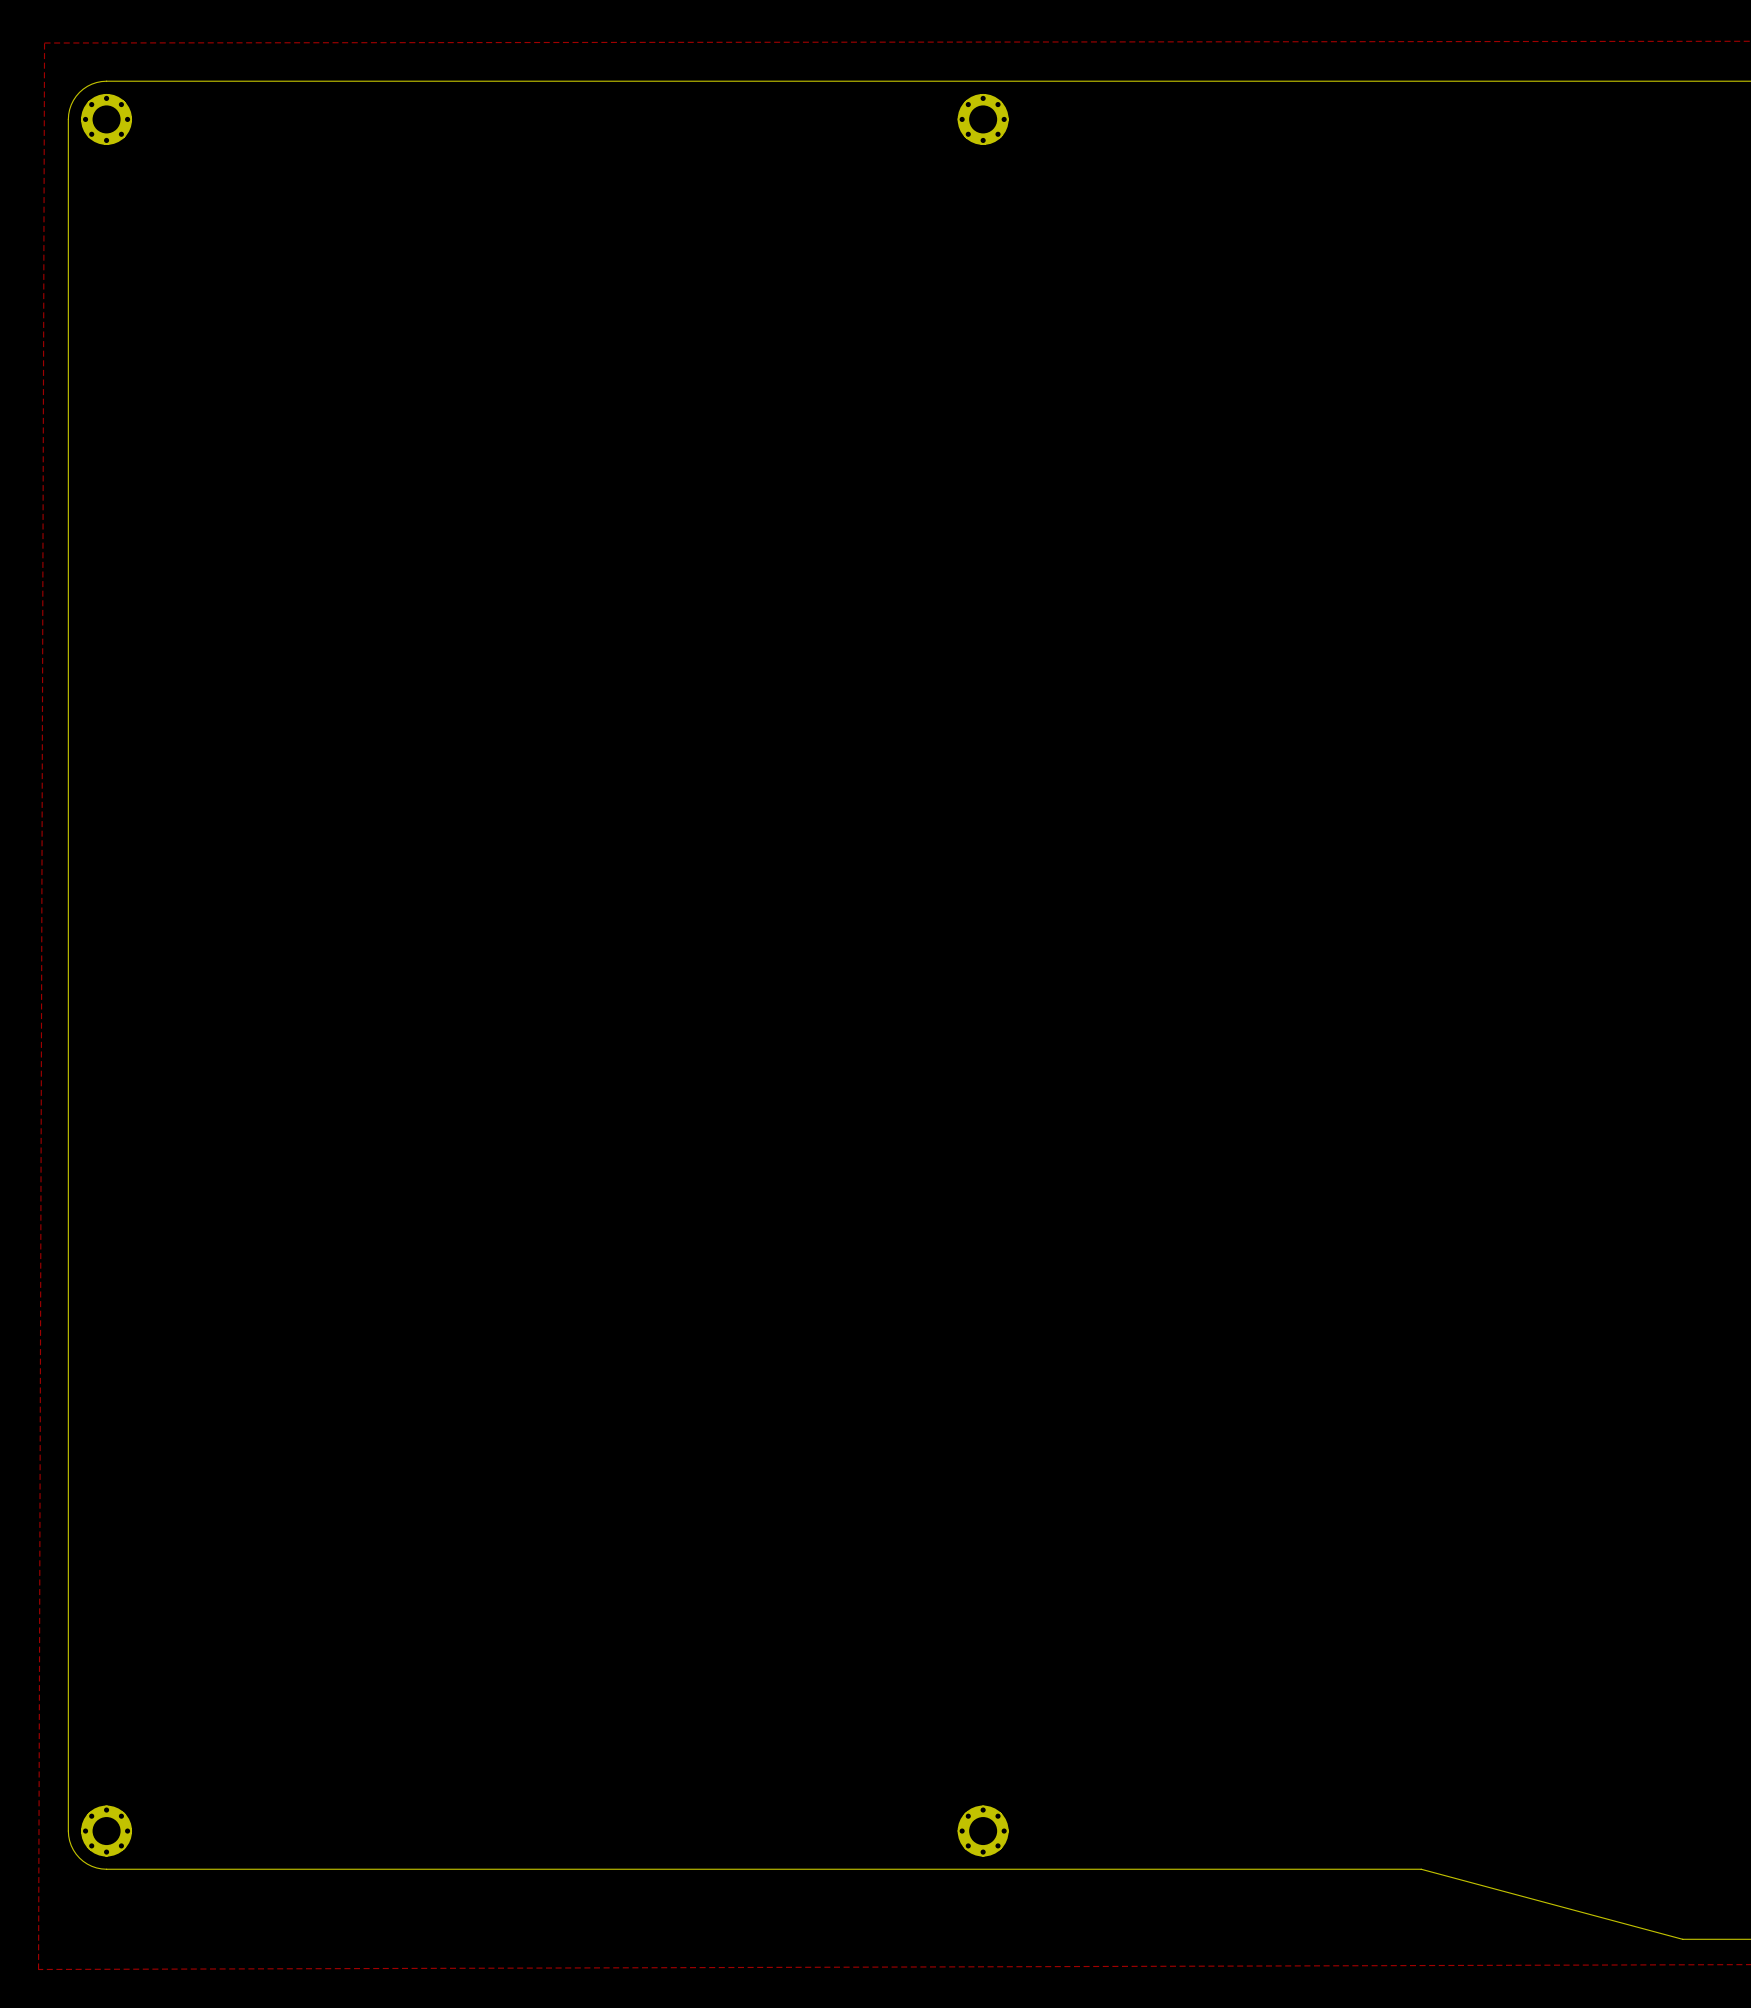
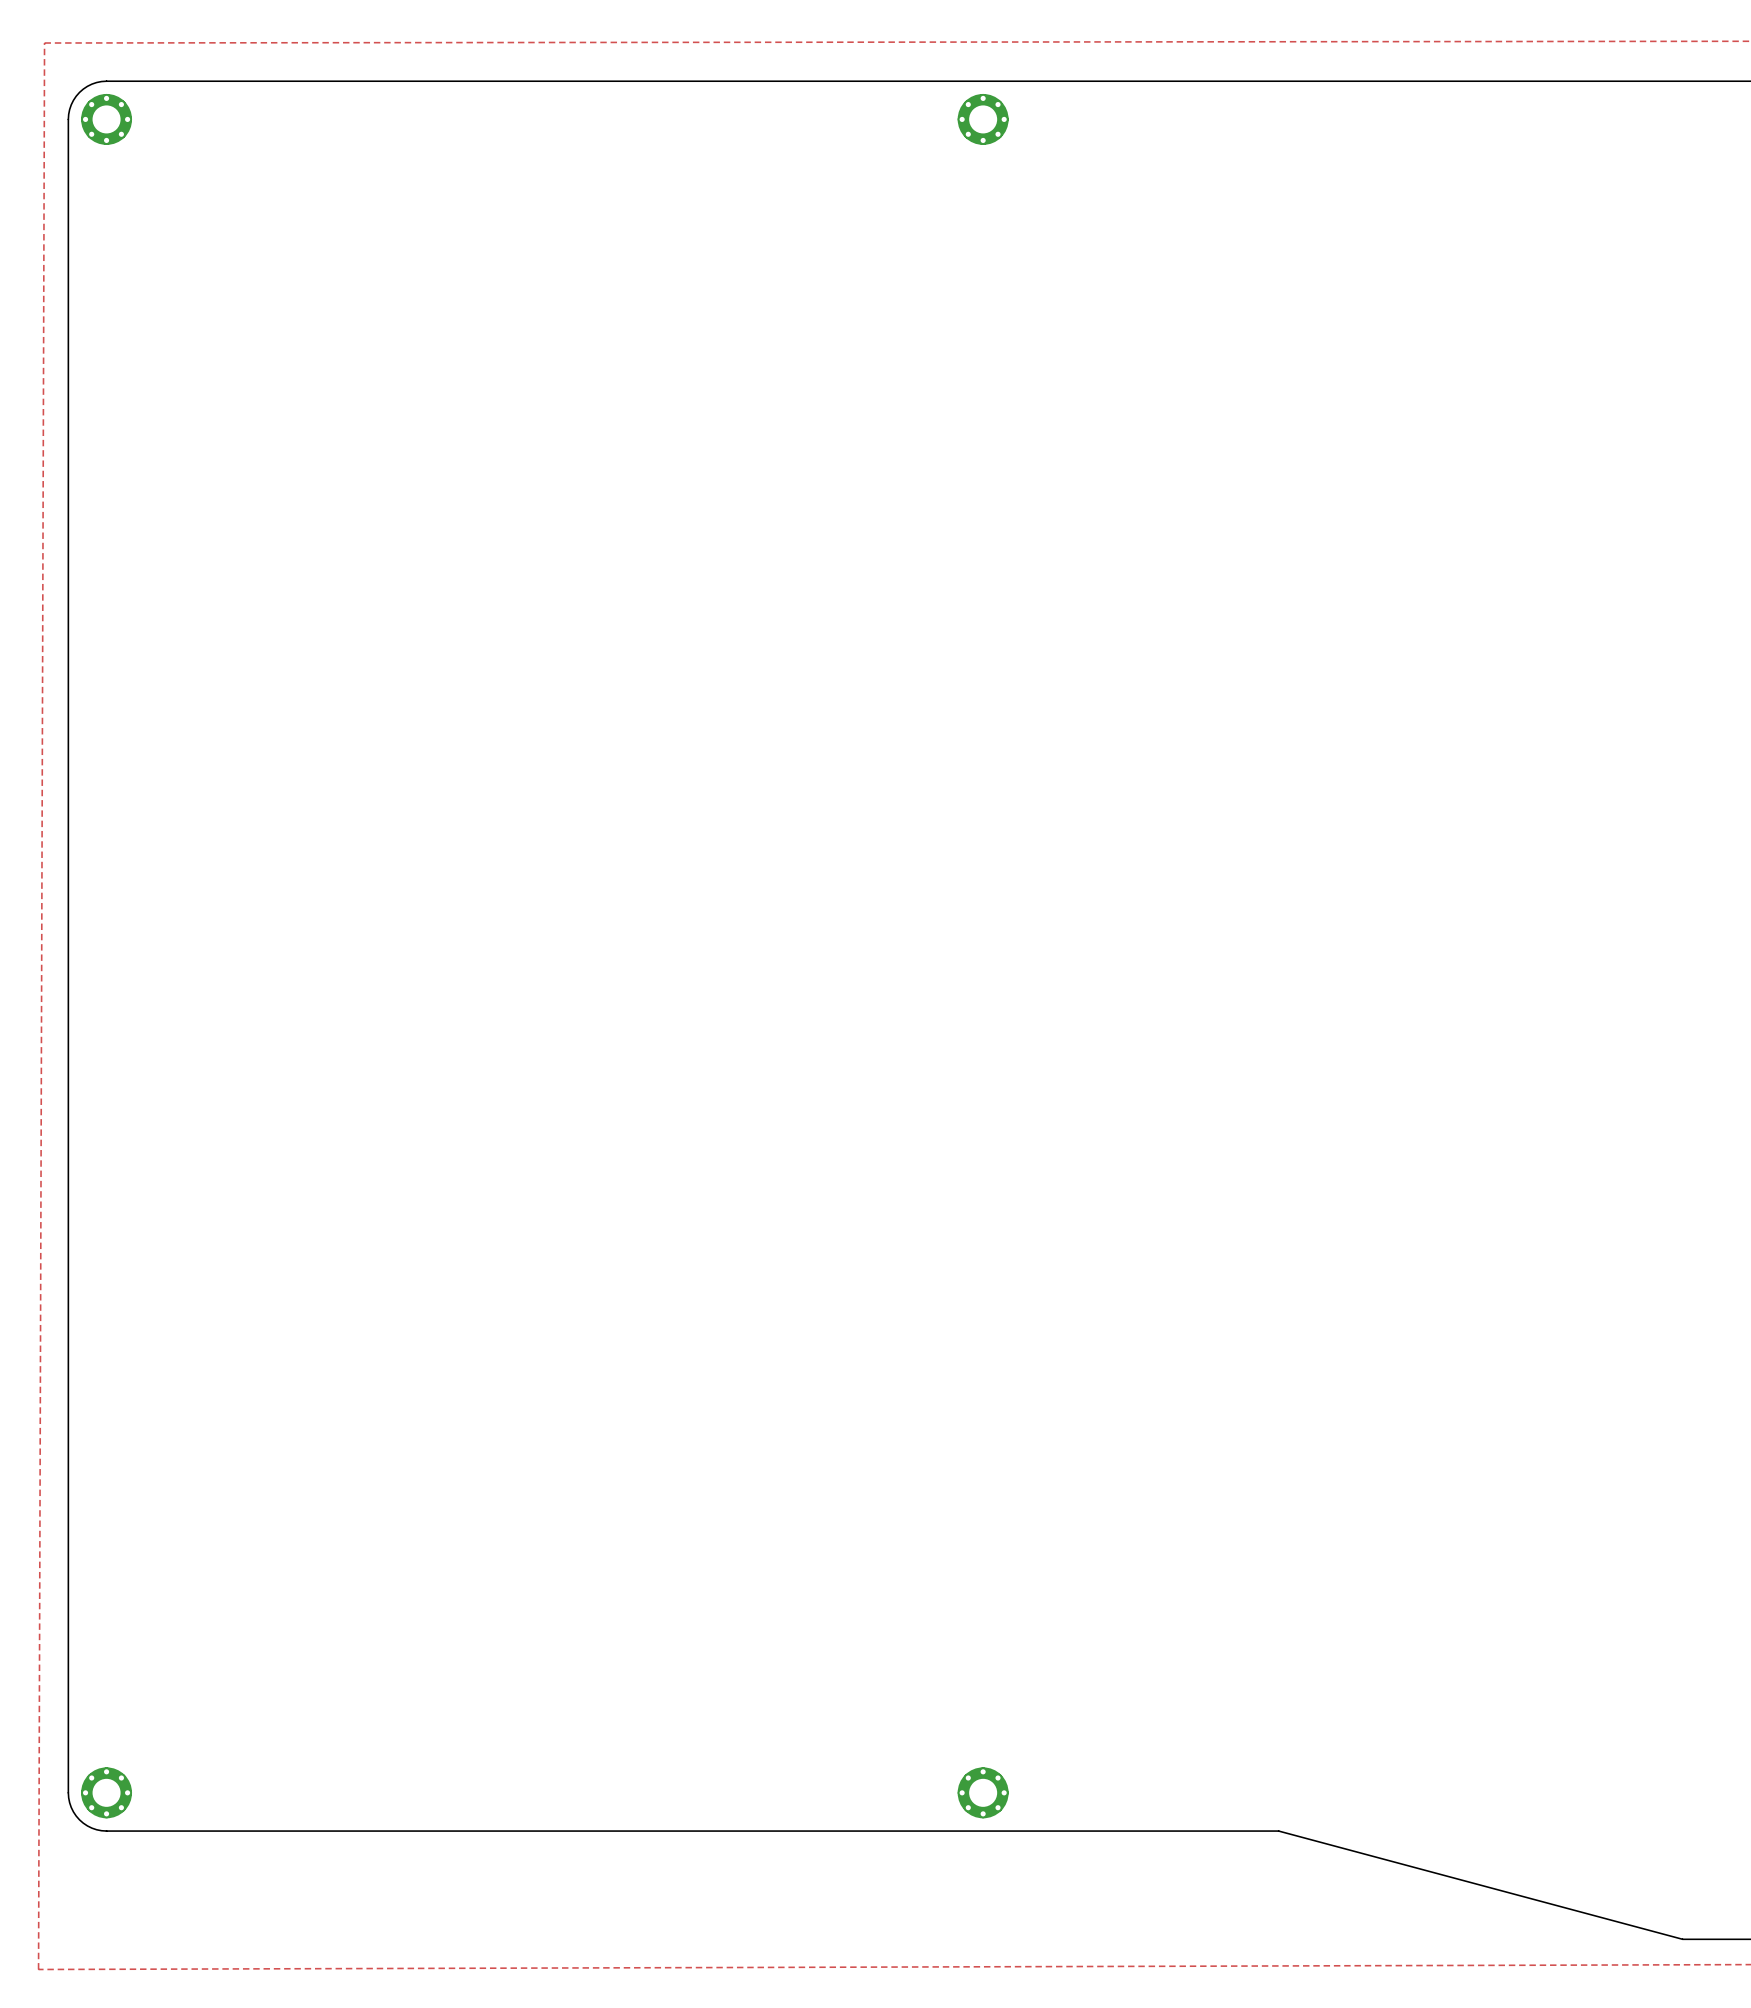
board edge: (68, 1792) (68, 1836) (73, 1850) (87, 1864) (106, 1869) (1421, 1869) -> (68, 1792) (71, 1807) (79, 1819) (91, 1828) (106, 1831) (1278, 1831) (1421, 1869)
part position: (106, 1831) -> (106, 1792)
part position: (983, 1831) -> (983, 1792)

